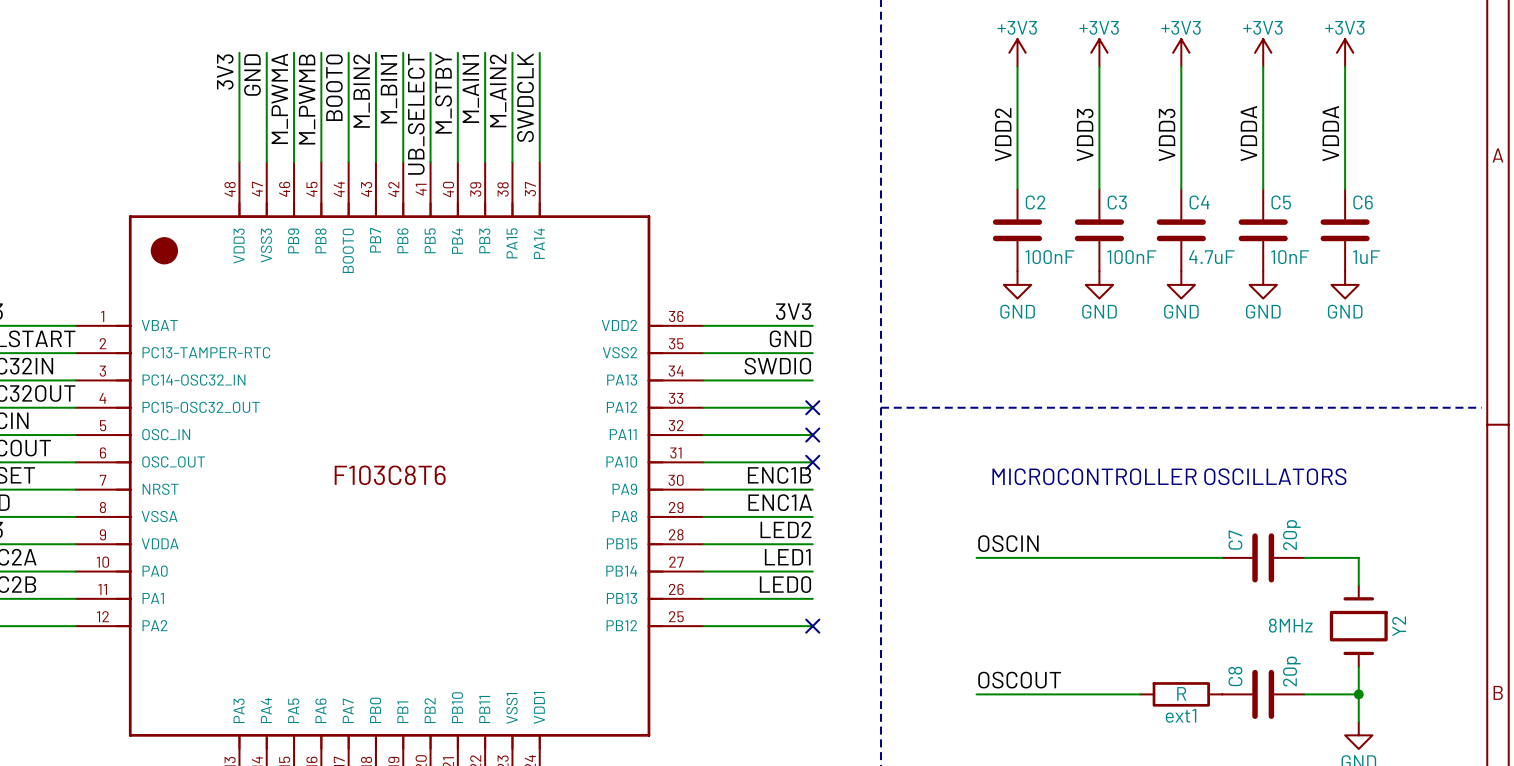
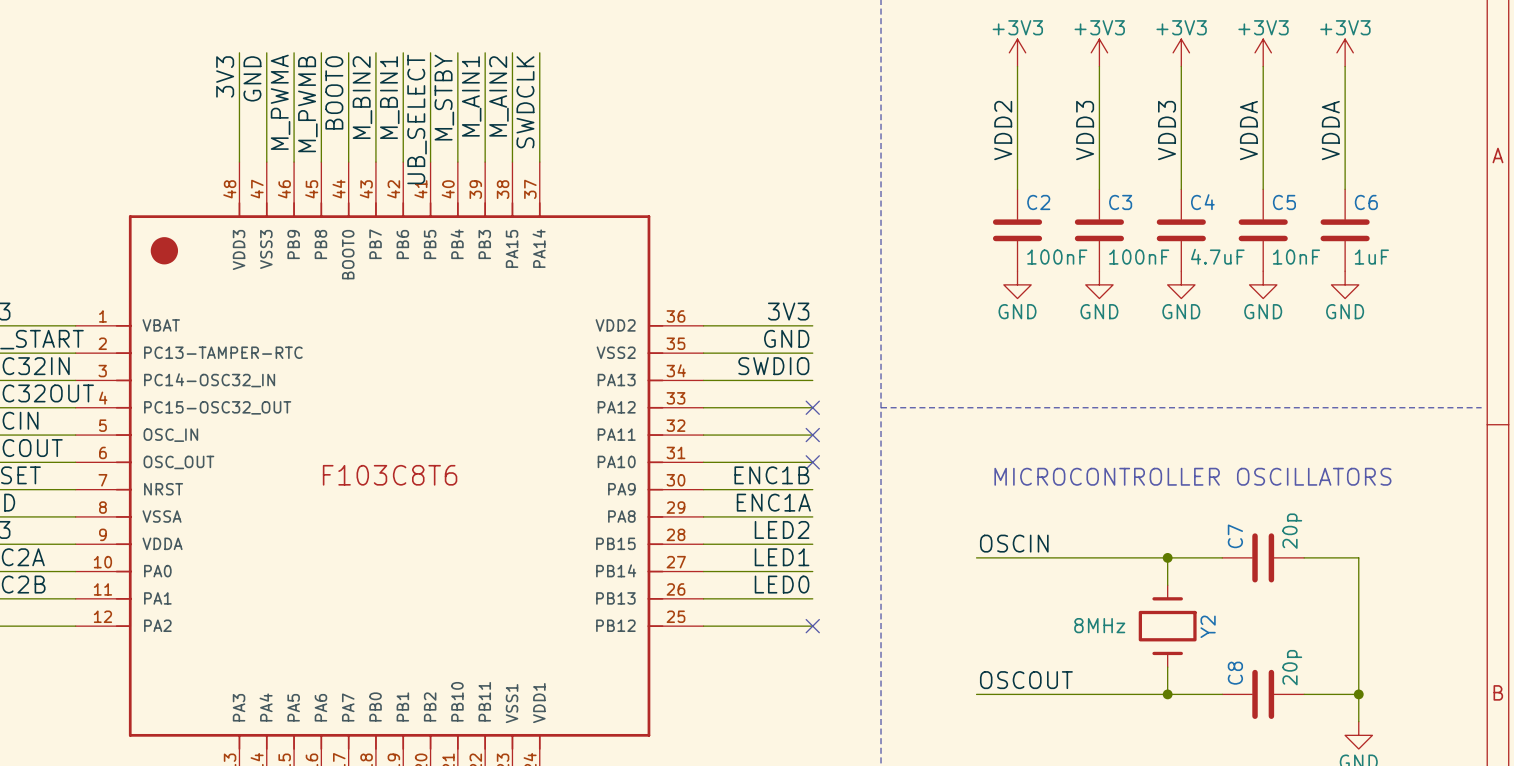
wire: none -> (1167, 557) (1167, 585)
junction: none -> (1167, 557)
wire: none -> (1358, 585) (1358, 667)
Y2 position: (1358, 626) -> (1167, 626)
wire: none -> (1167, 667) (1167, 694)
wire: none -> (1140, 694) (1222, 694)
junction: none -> (1167, 694)
ext1: R (1181, 694) -> none

